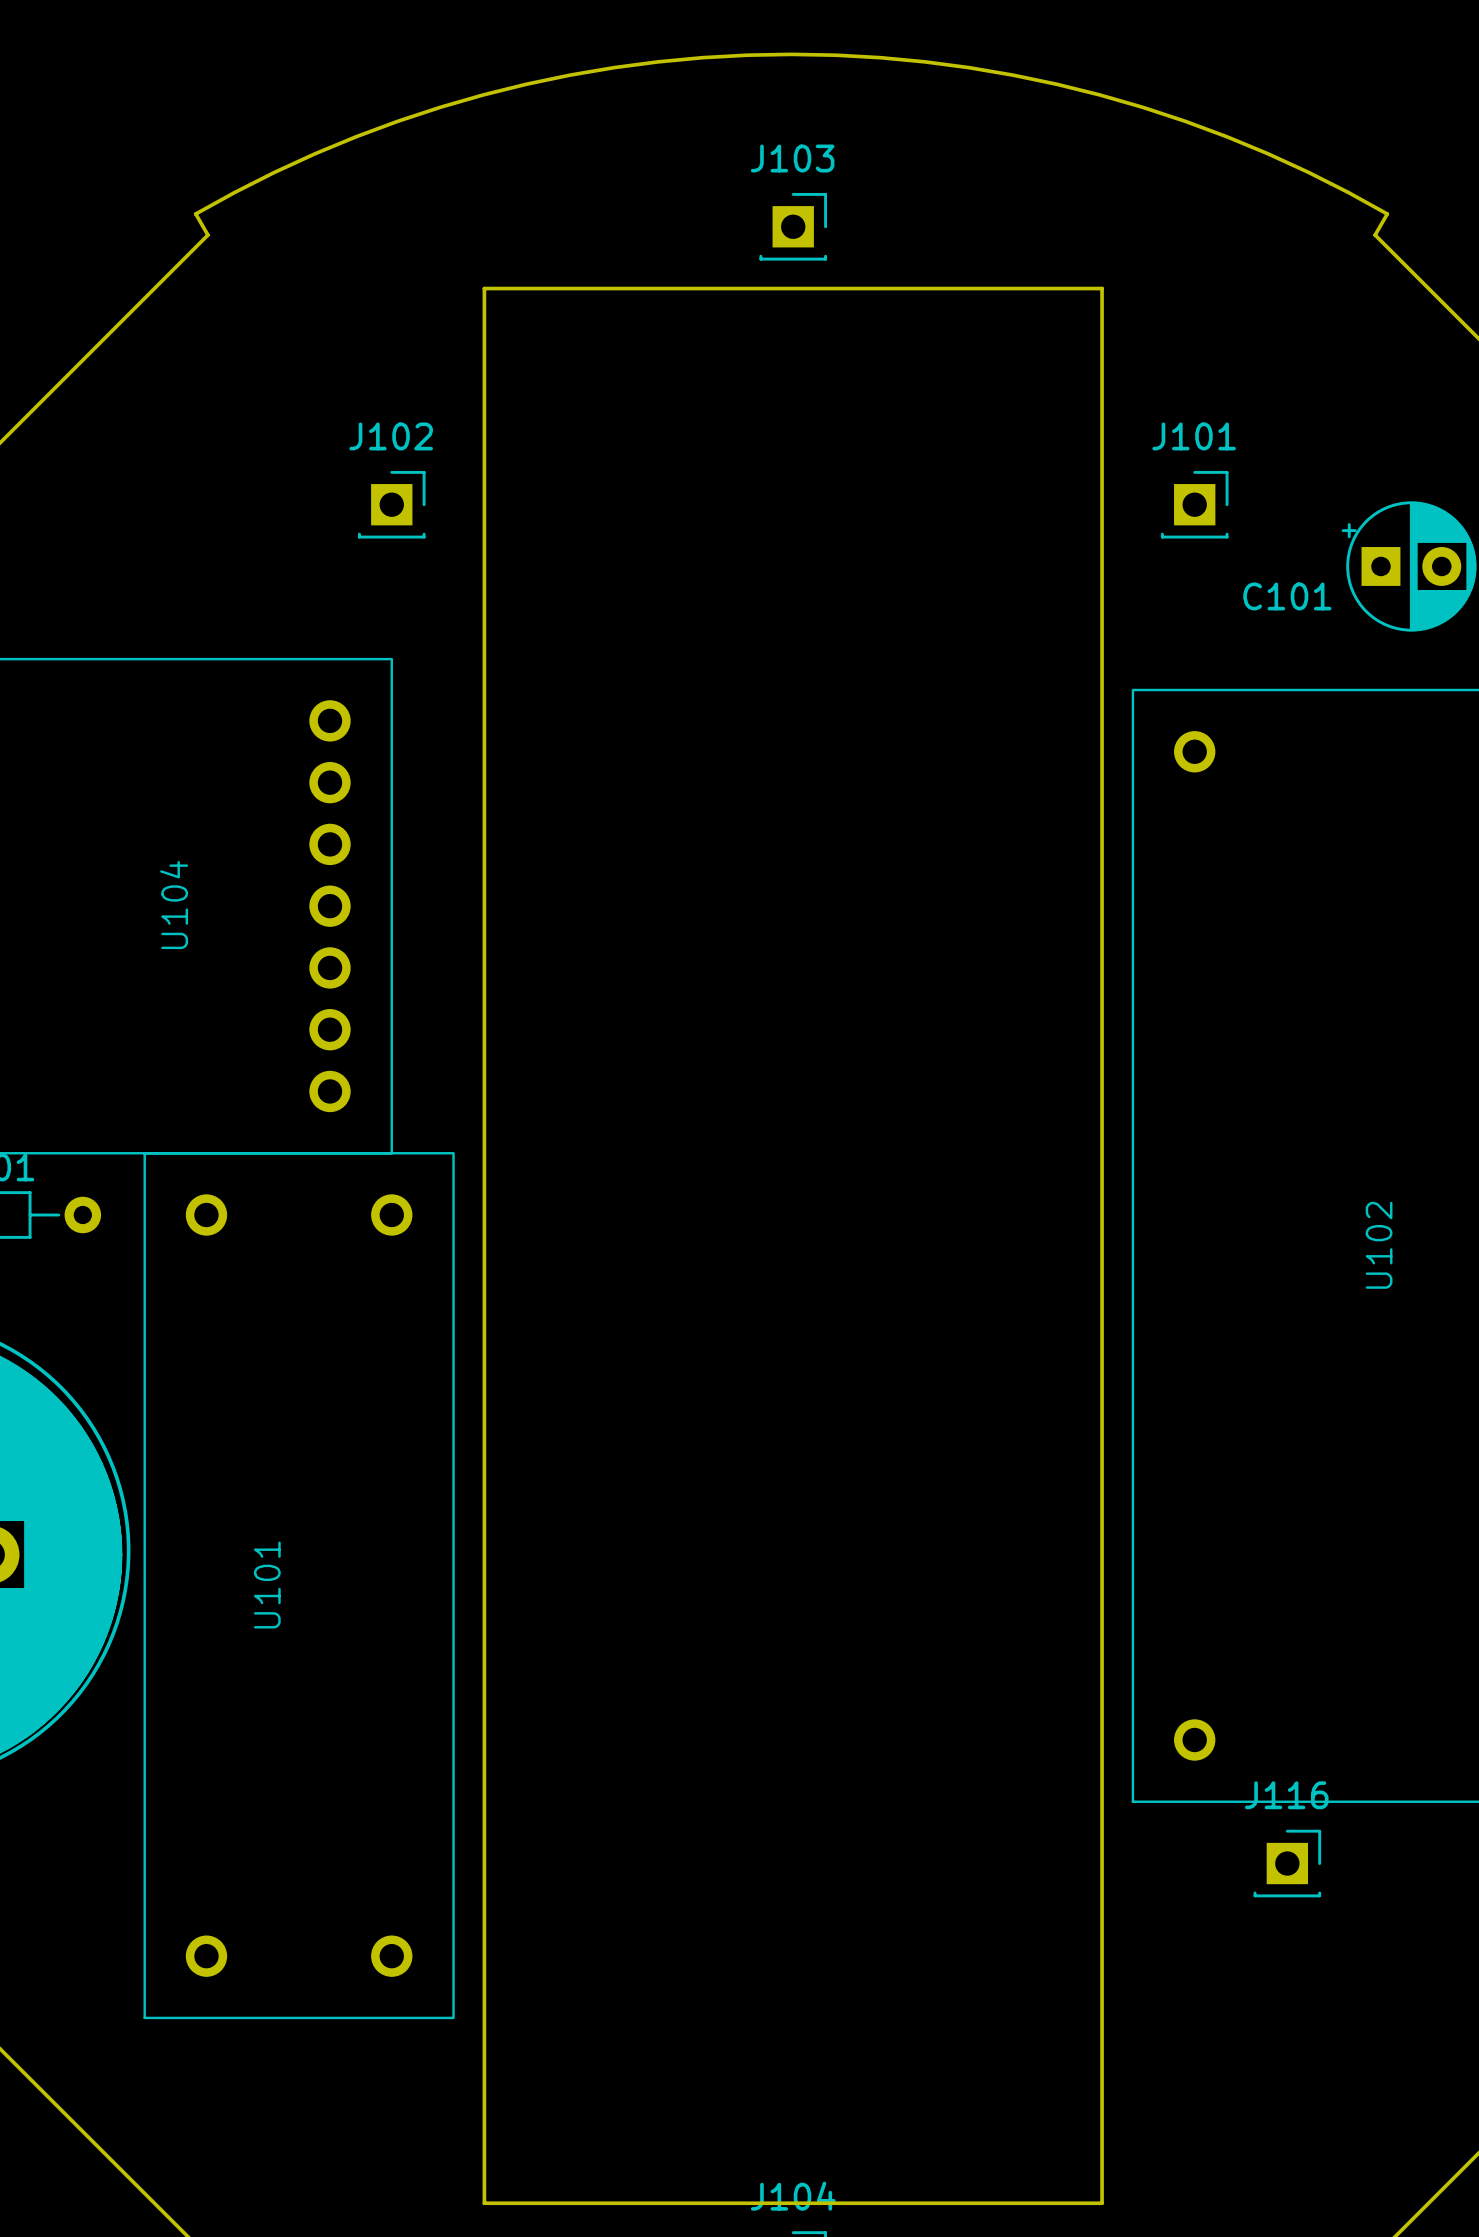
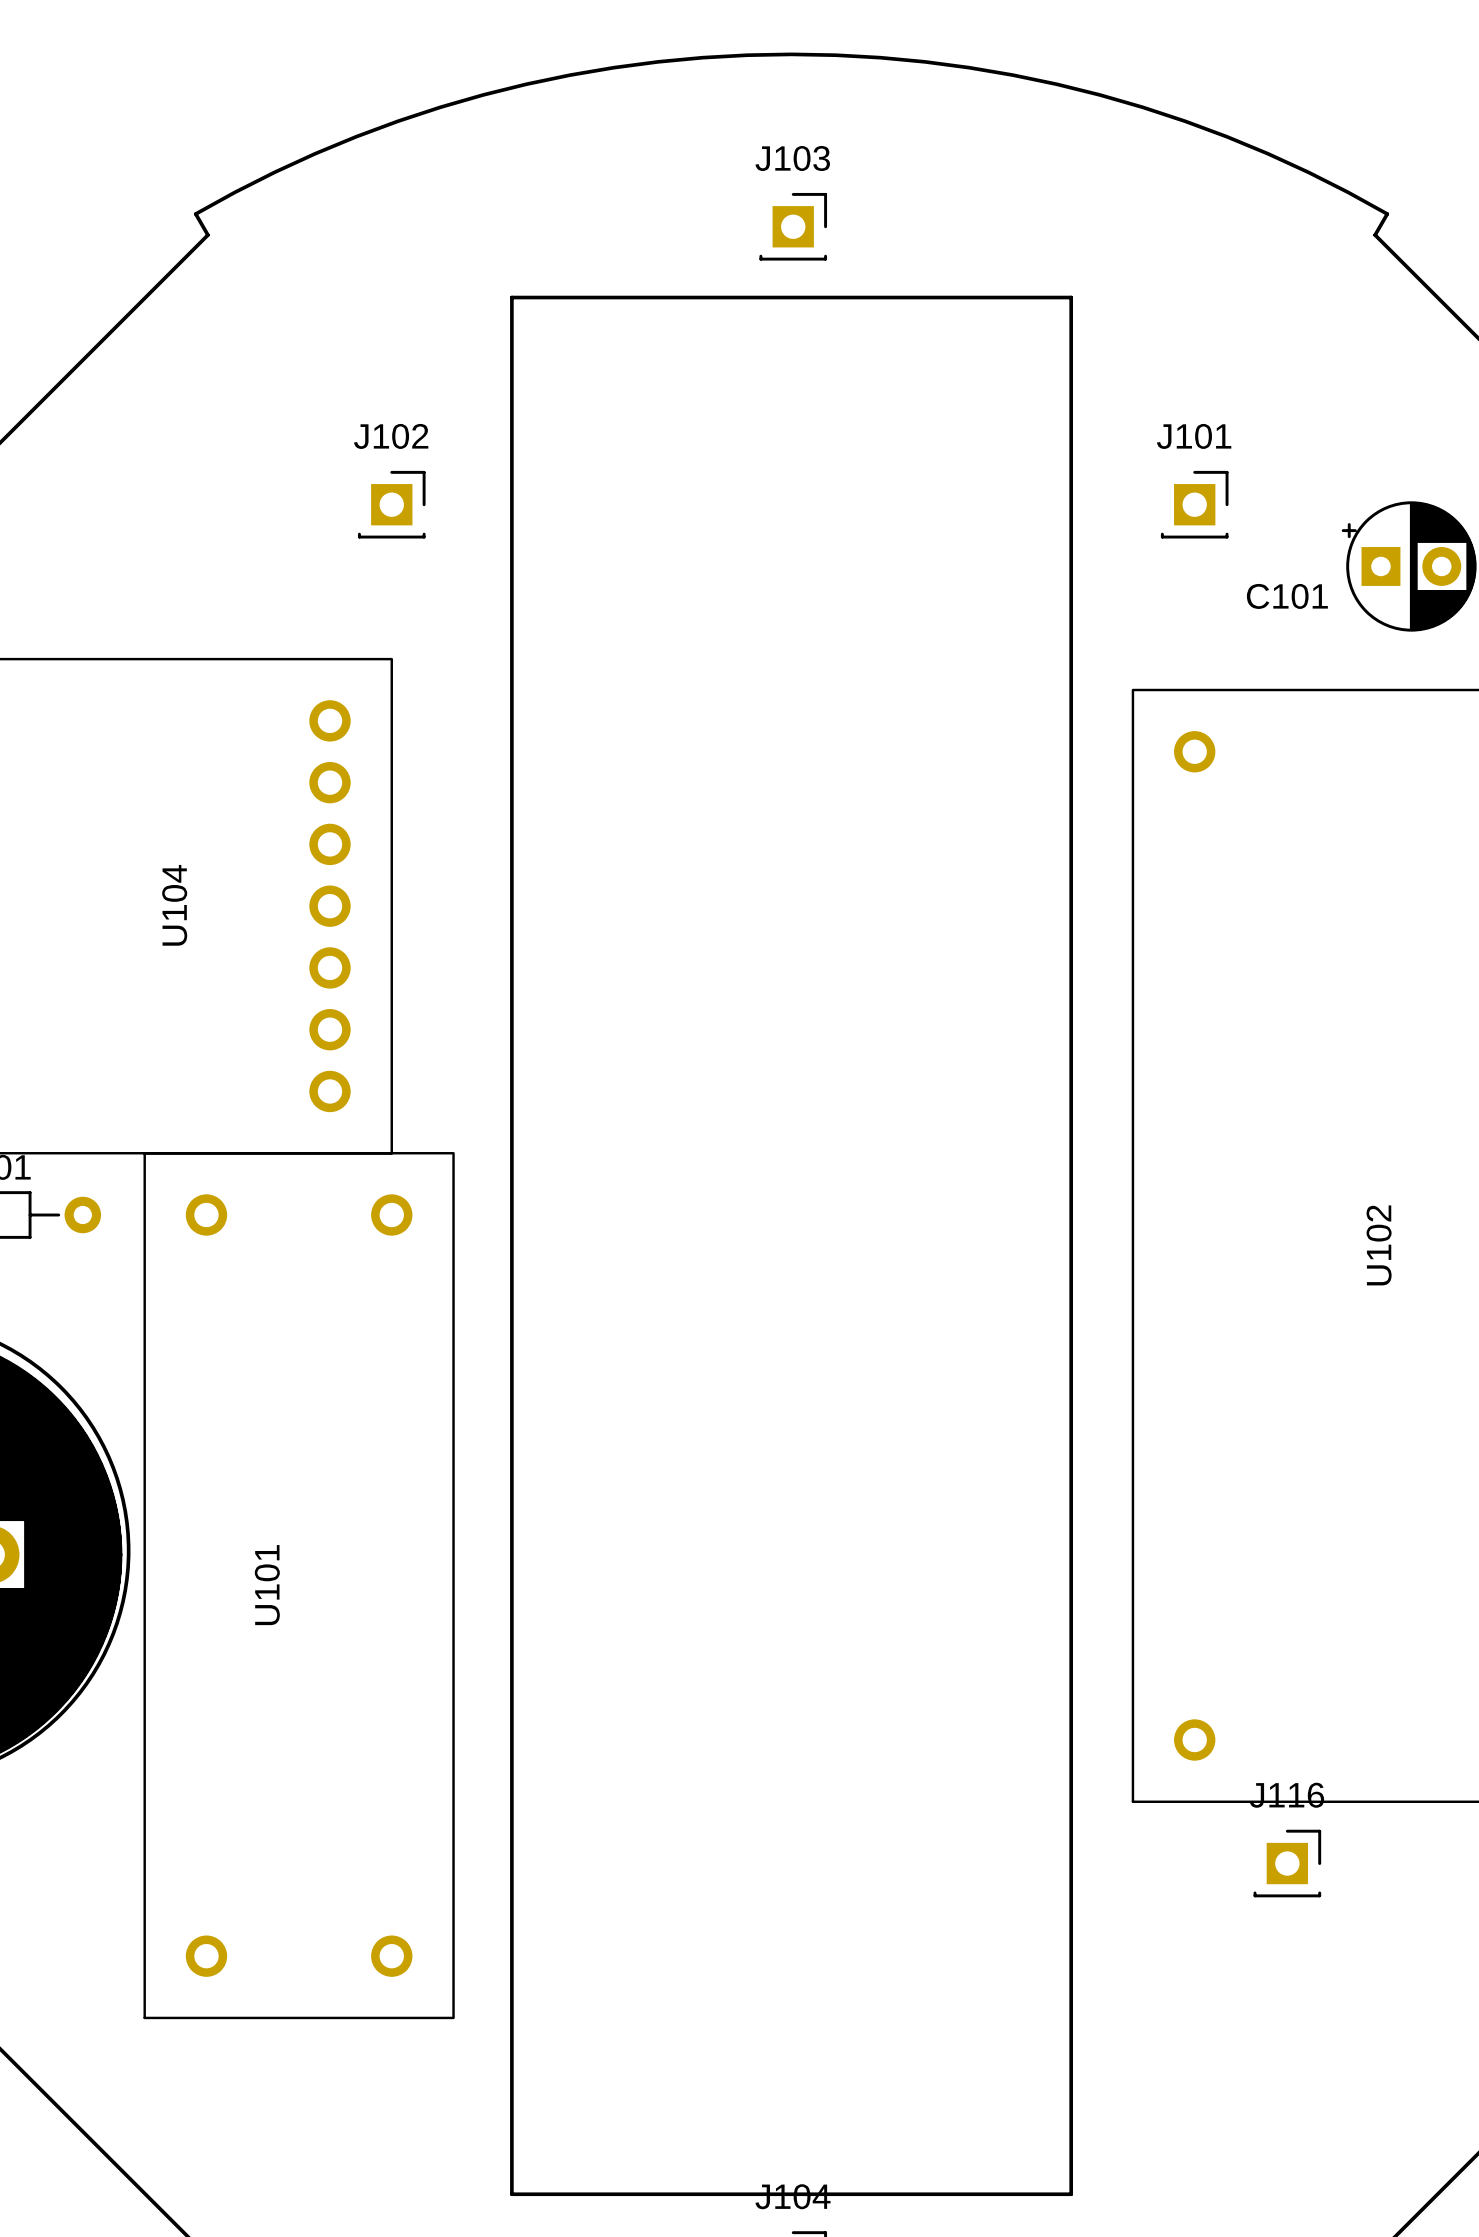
board edge: (484, 288) (484, 2203) (1102, 2203) (1102, 288) (484, 288) -> (511, 297) (511, 2194) (1071, 2194) (1071, 297) (511, 297)

